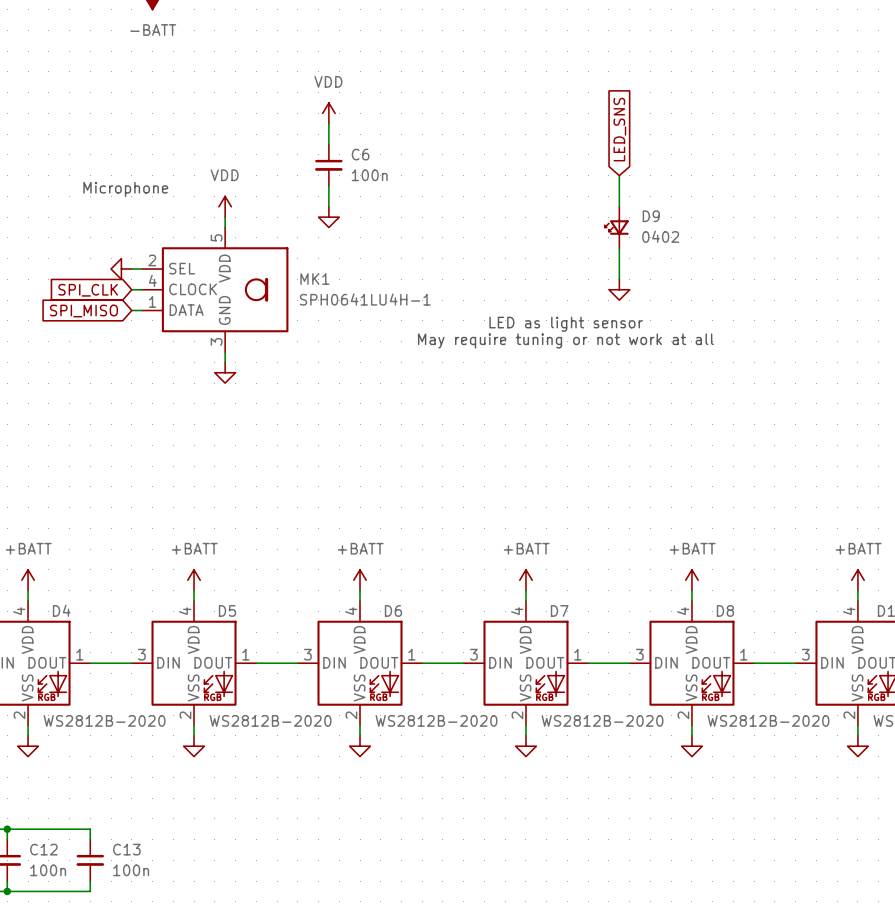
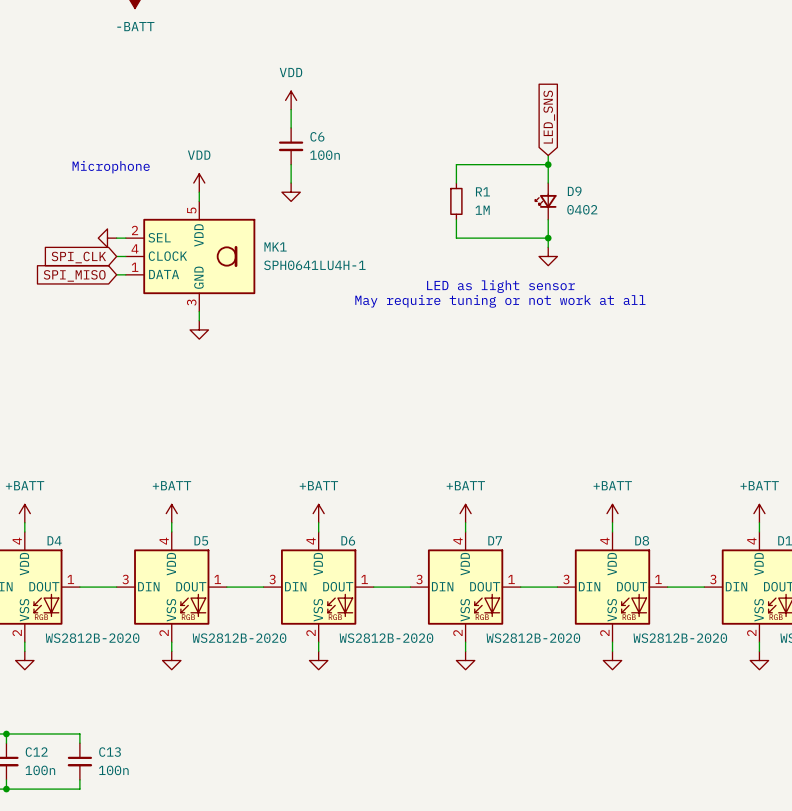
wire: none -> (548, 164) (456, 164) (456, 183)
junction: none -> (548, 164)
R1: none -> 1M (456, 201)
wire: none -> (456, 219) (456, 238) (548, 238)
junction: none -> (548, 238)

